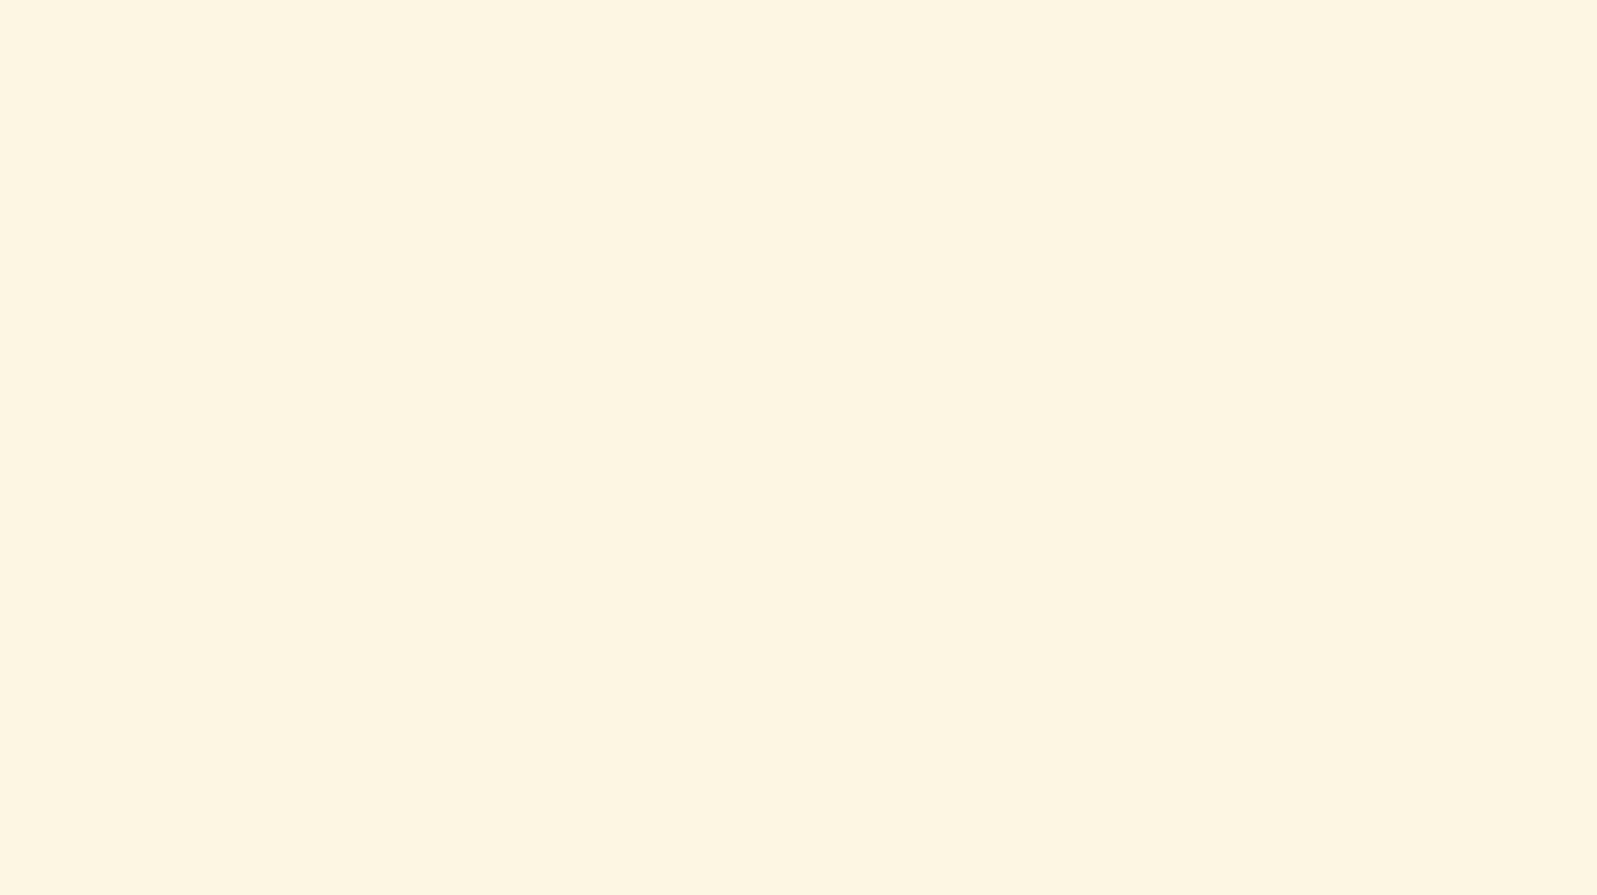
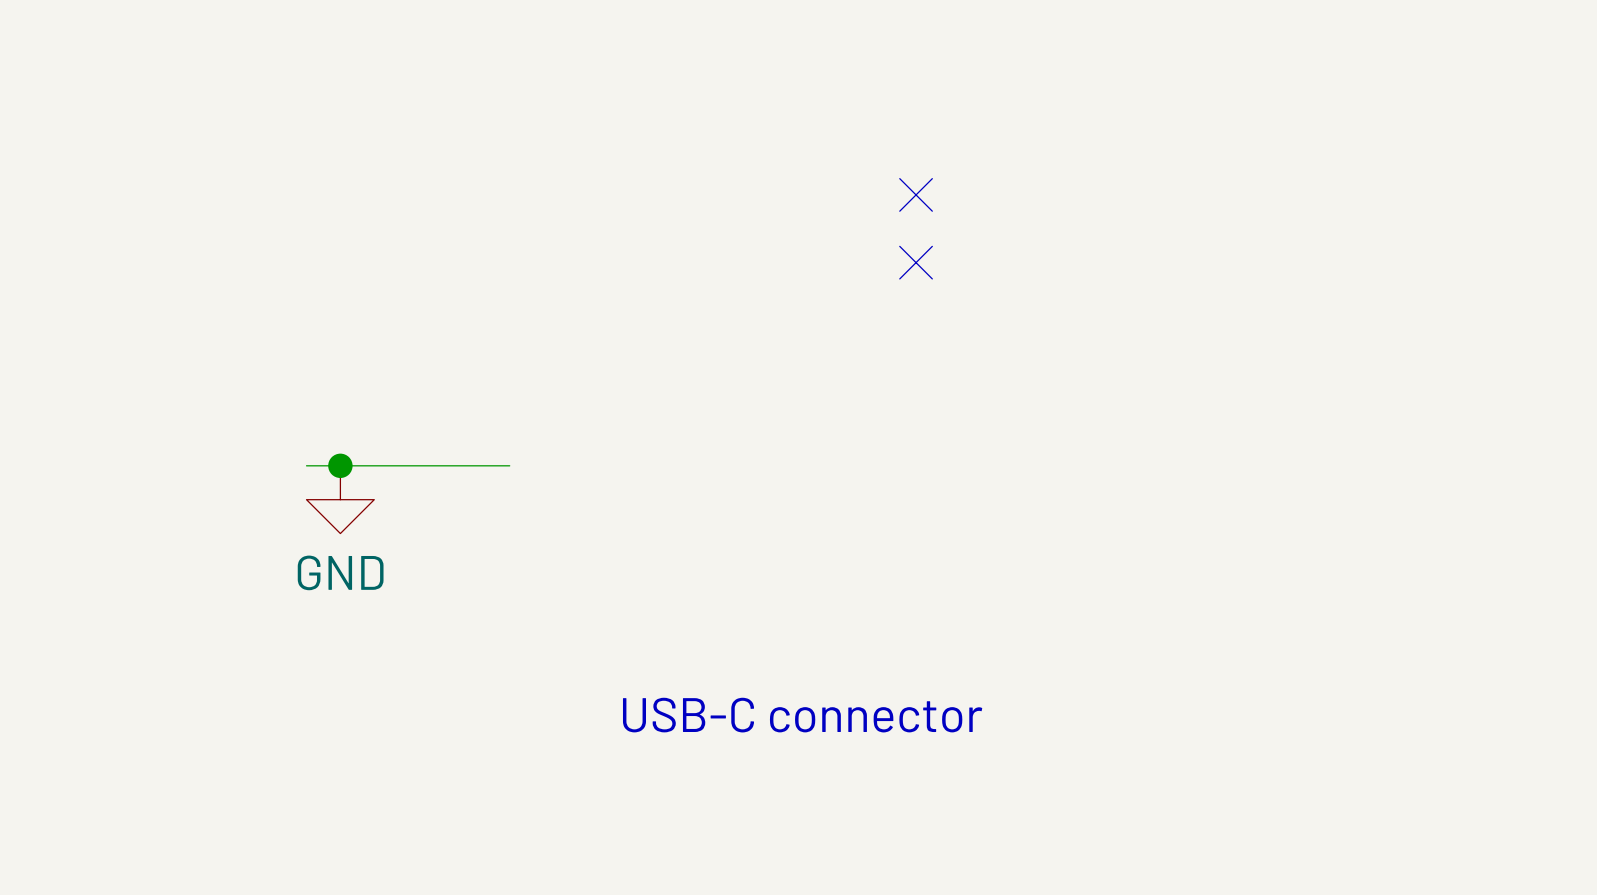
no-connect mark: none -> (916, 194)
no-connect mark: none -> (916, 262)
wire: none -> (306, 465) (509, 465)
junction: none -> (340, 465)
power symbol: none -> GND (340, 499)
text: none -> USB-C connector (802, 715)

